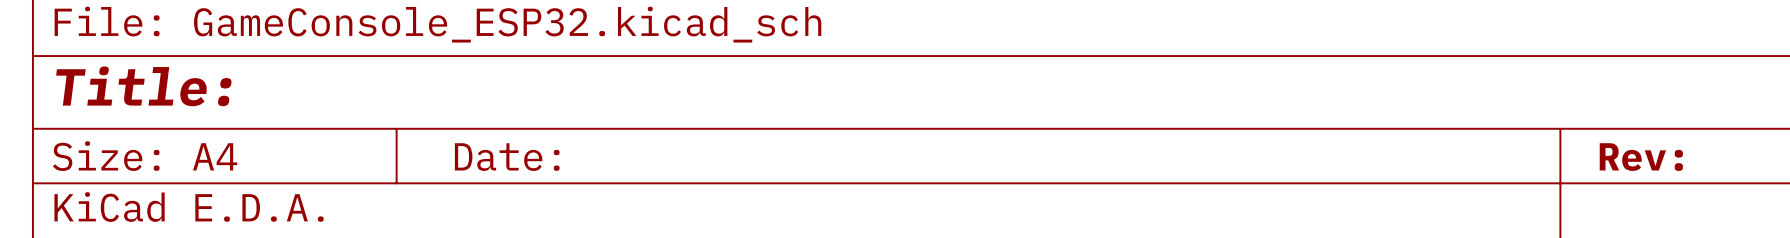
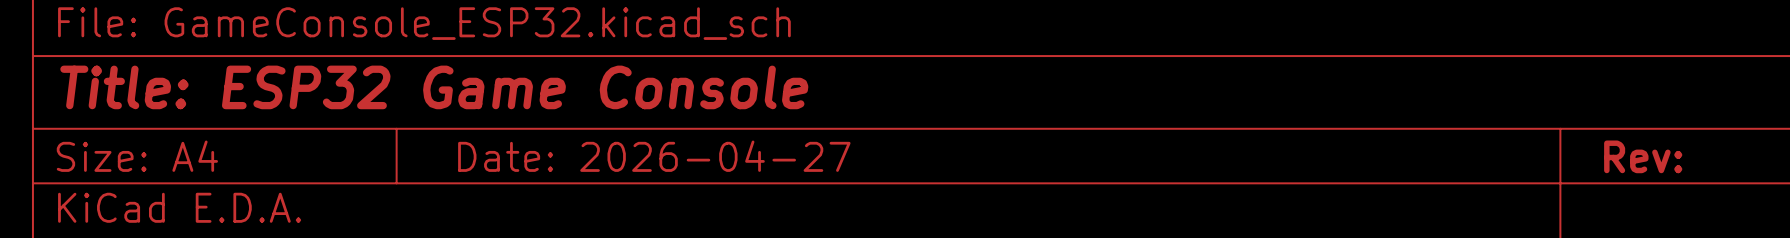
title block: Title: (143, 86) -> Title: ESP32 Game Console (434, 87)
title block: Date: (507, 157) -> Date: 2026-04-27 (654, 156)

